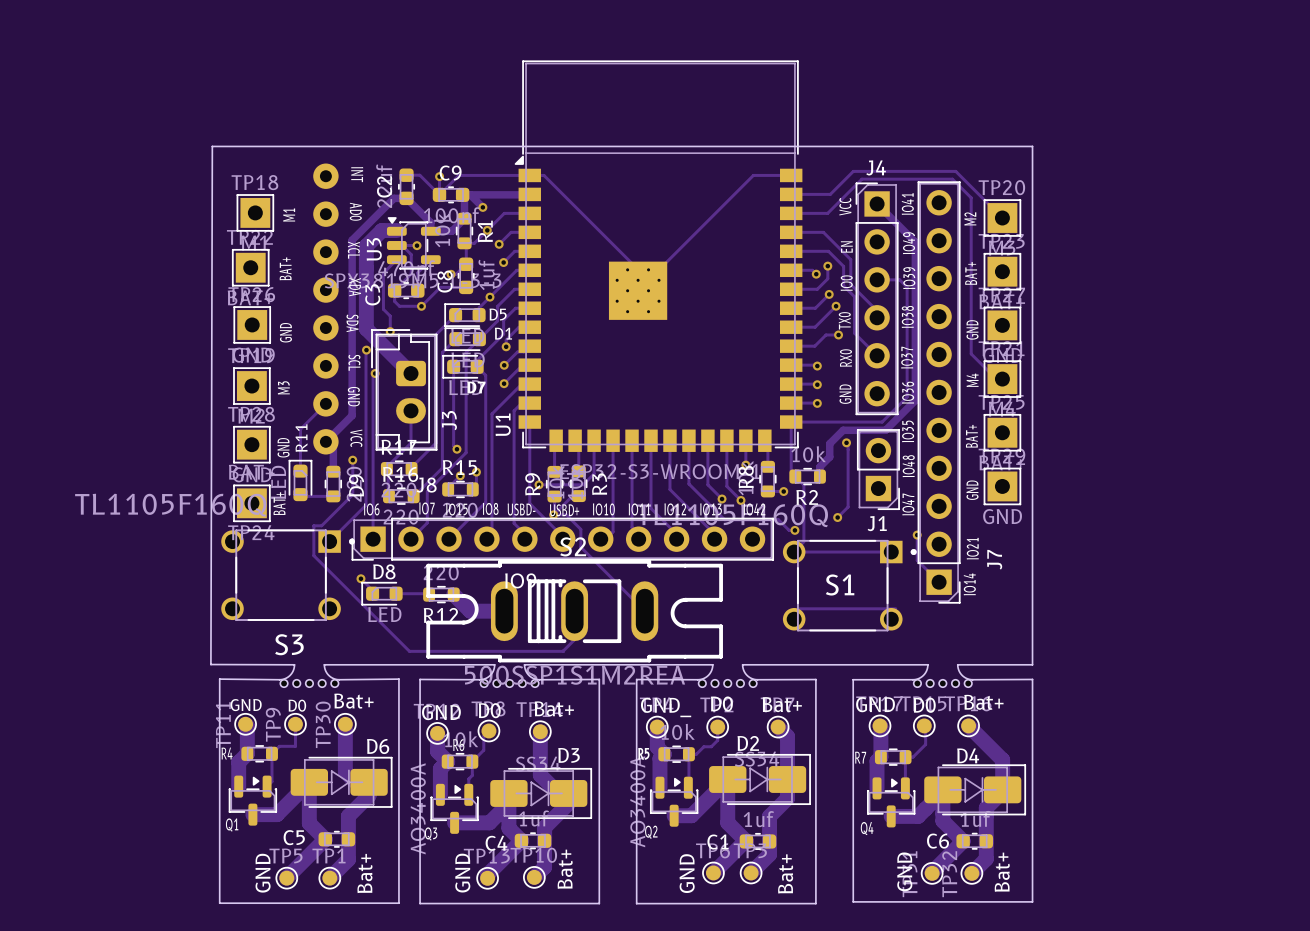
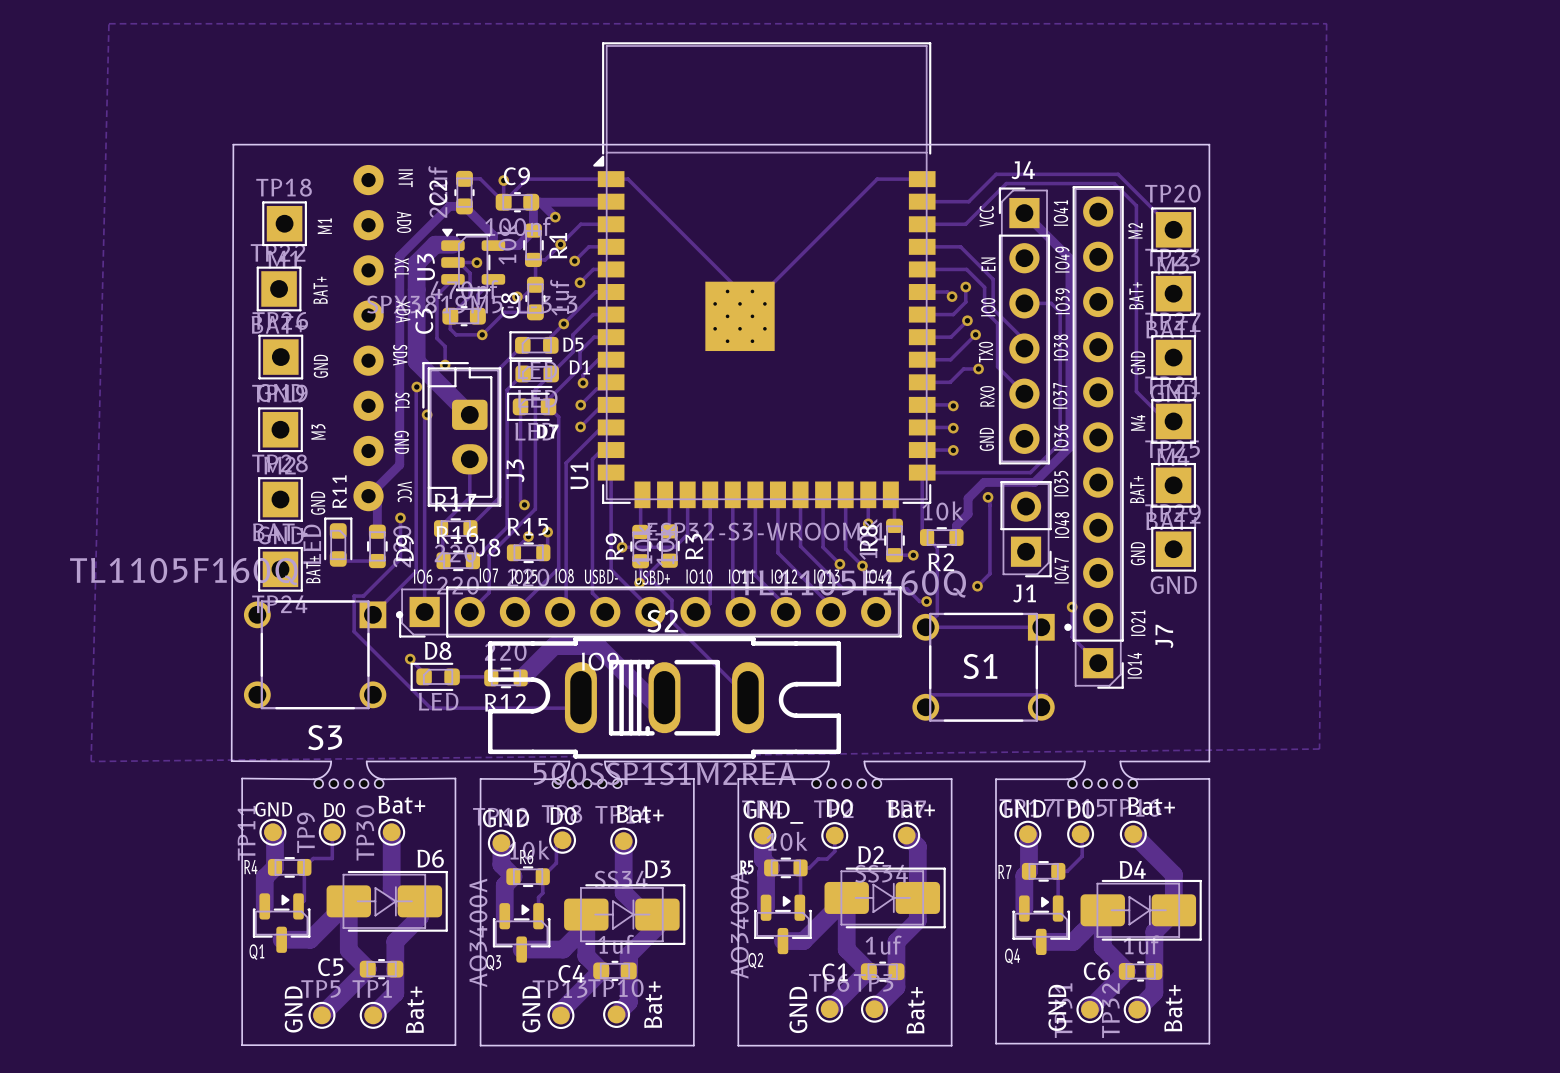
zone outline: none -> (108, 23) (1326, 23) (1319, 749) (91, 761) (108, 23)
track: (325, 403) (300, 429) (300, 471) -> none
track: none -> (524, 676) (554, 646) (597, 646) (660, 708)
track: (453, 594) (470, 611) (504, 611) -> none
track: (574, 611) (574, 639) (563, 651) (409, 651) (378, 619) -> (576, 708) (430, 708)

